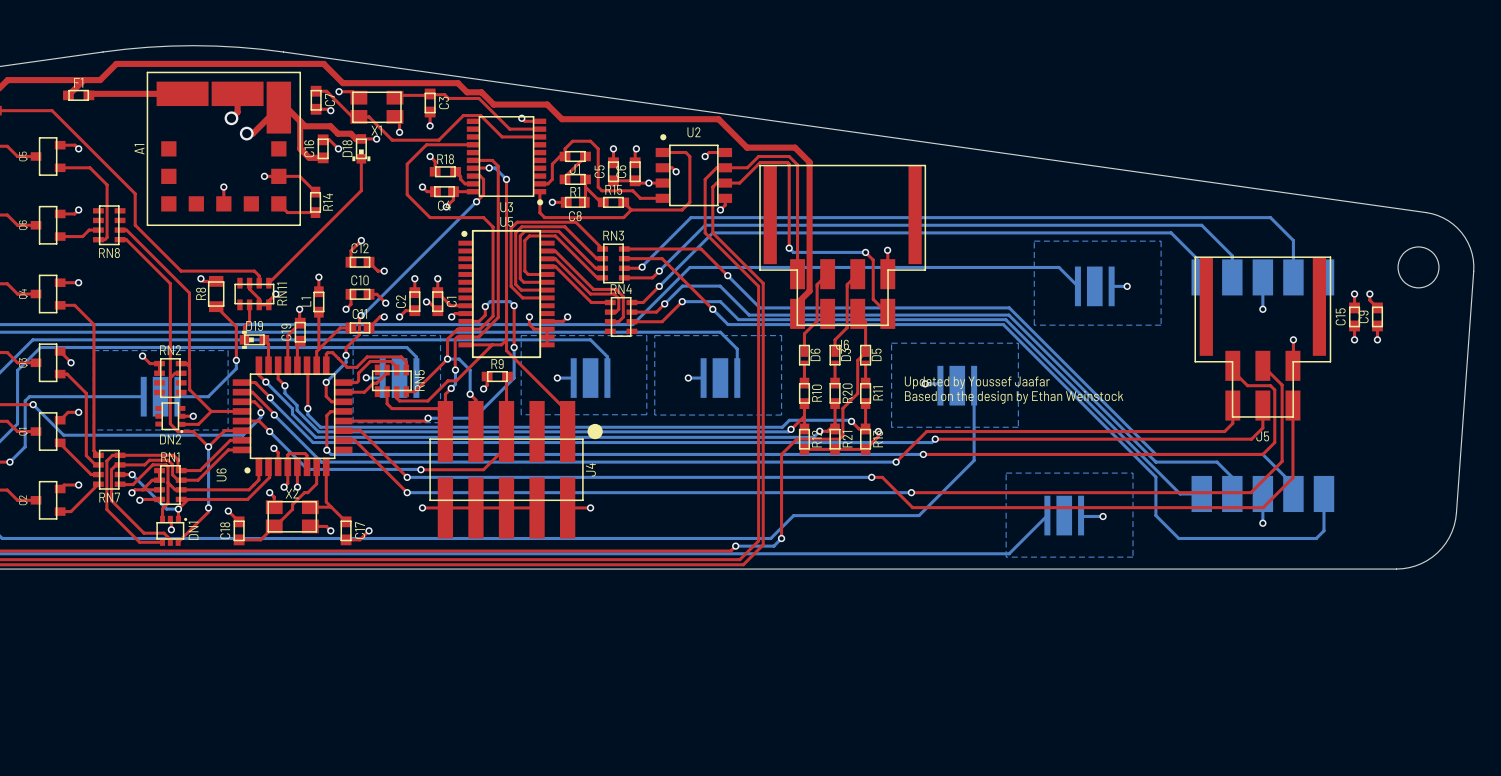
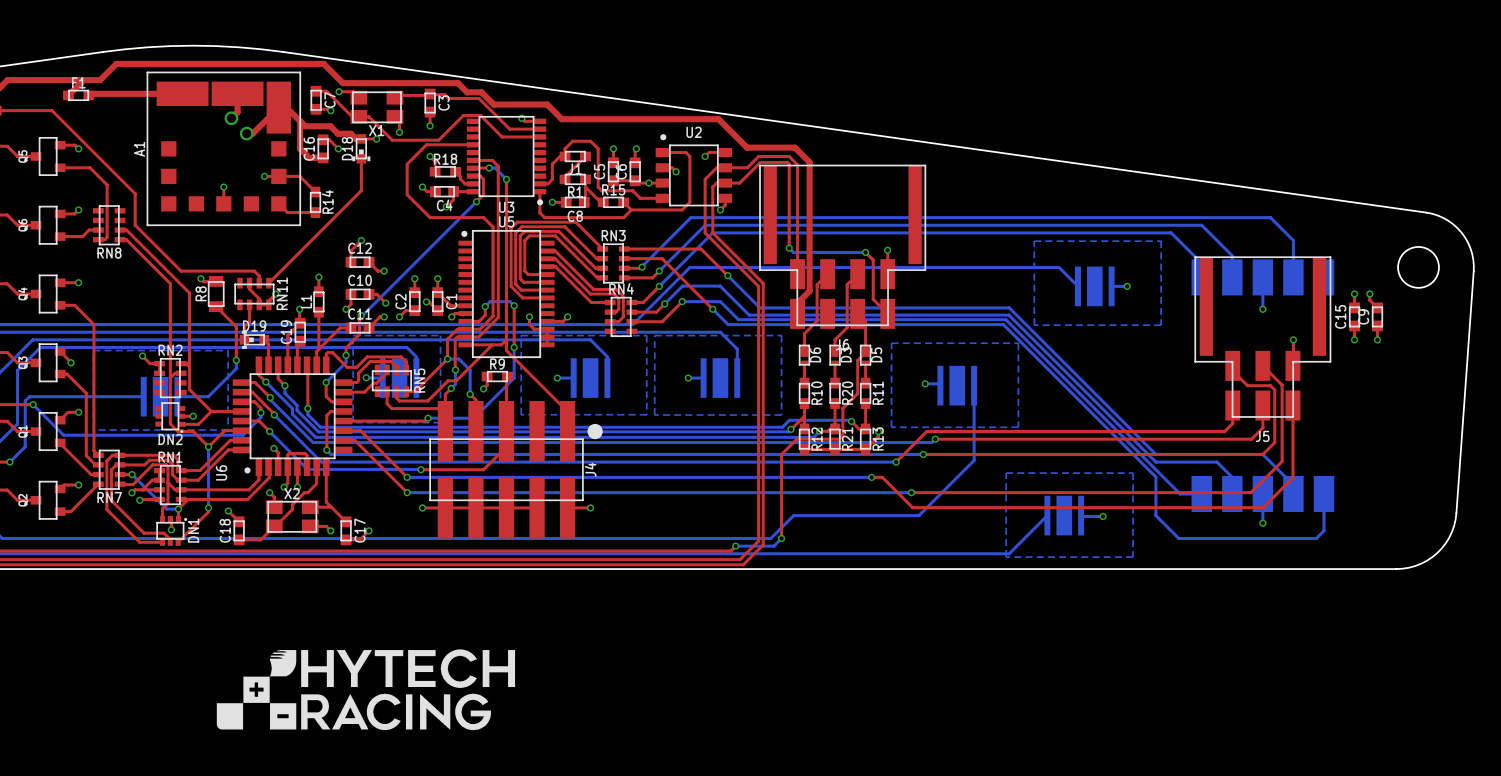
text: Updated by Youssef Jaafar (977, 382) -> none
text: Based on the design by Ethan Weinstock (1014, 397) -> none
drawing: none -> [216, 649, 516, 731]

